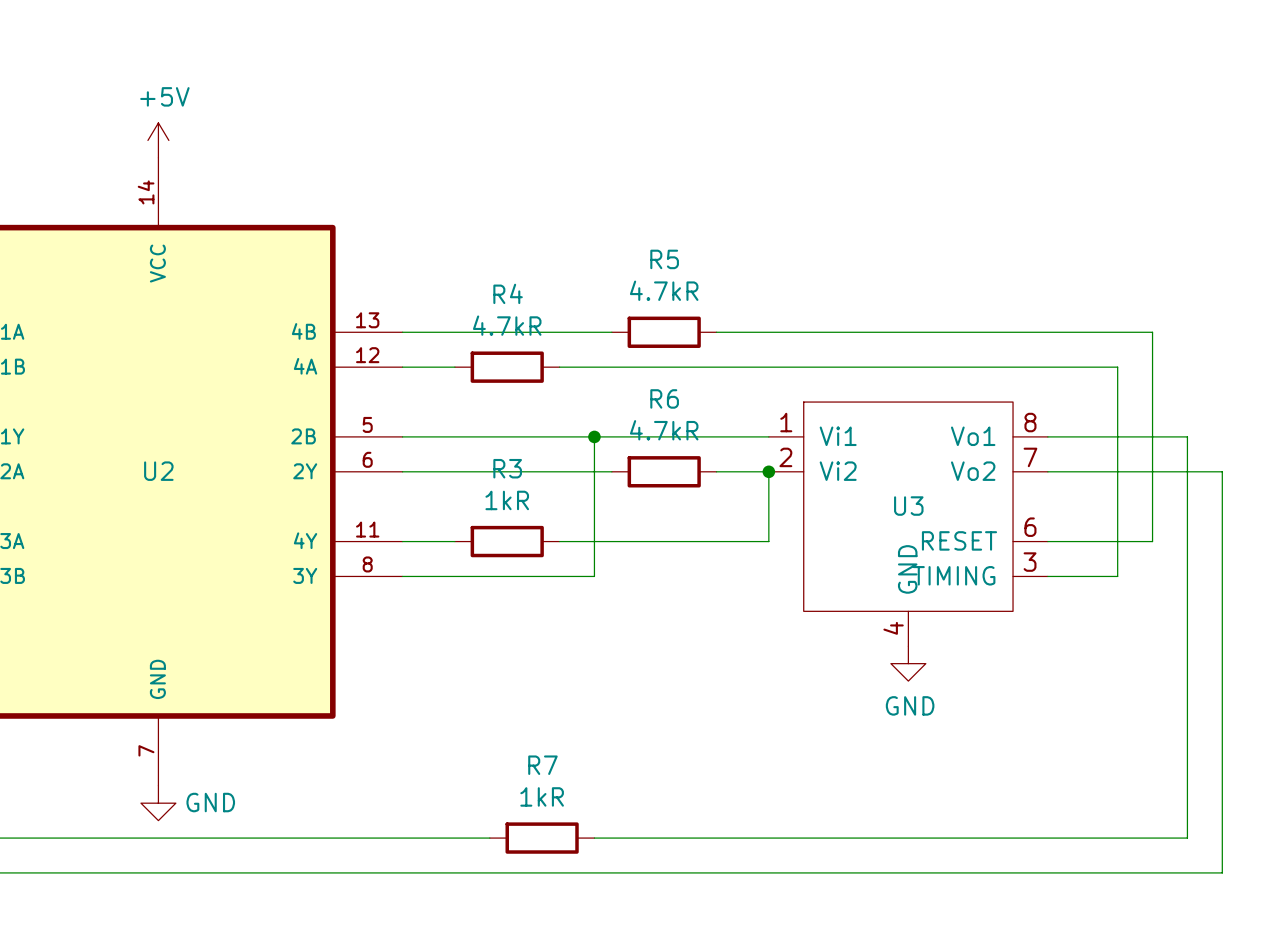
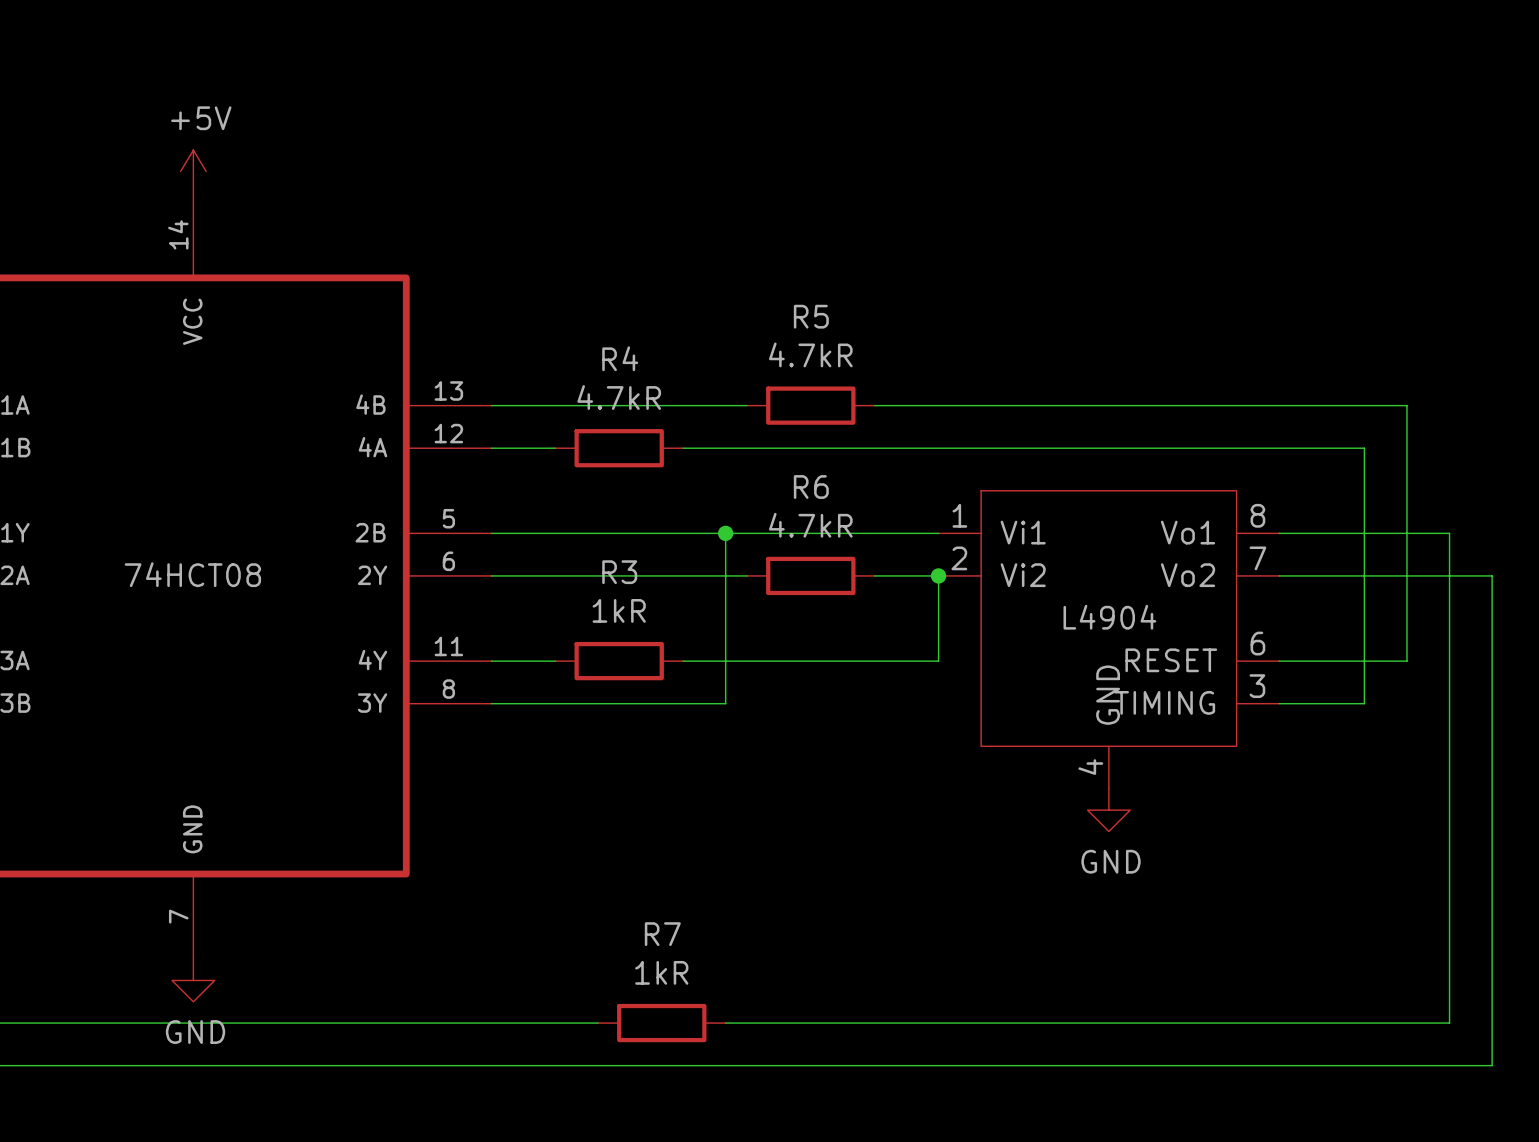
part value: U2 (158, 471) -> 74HCT08 (192, 574)
part value: U3 (908, 506) -> L4904 (1109, 617)
power symbol text position: GND (210, 802) -> GND (195, 1032)

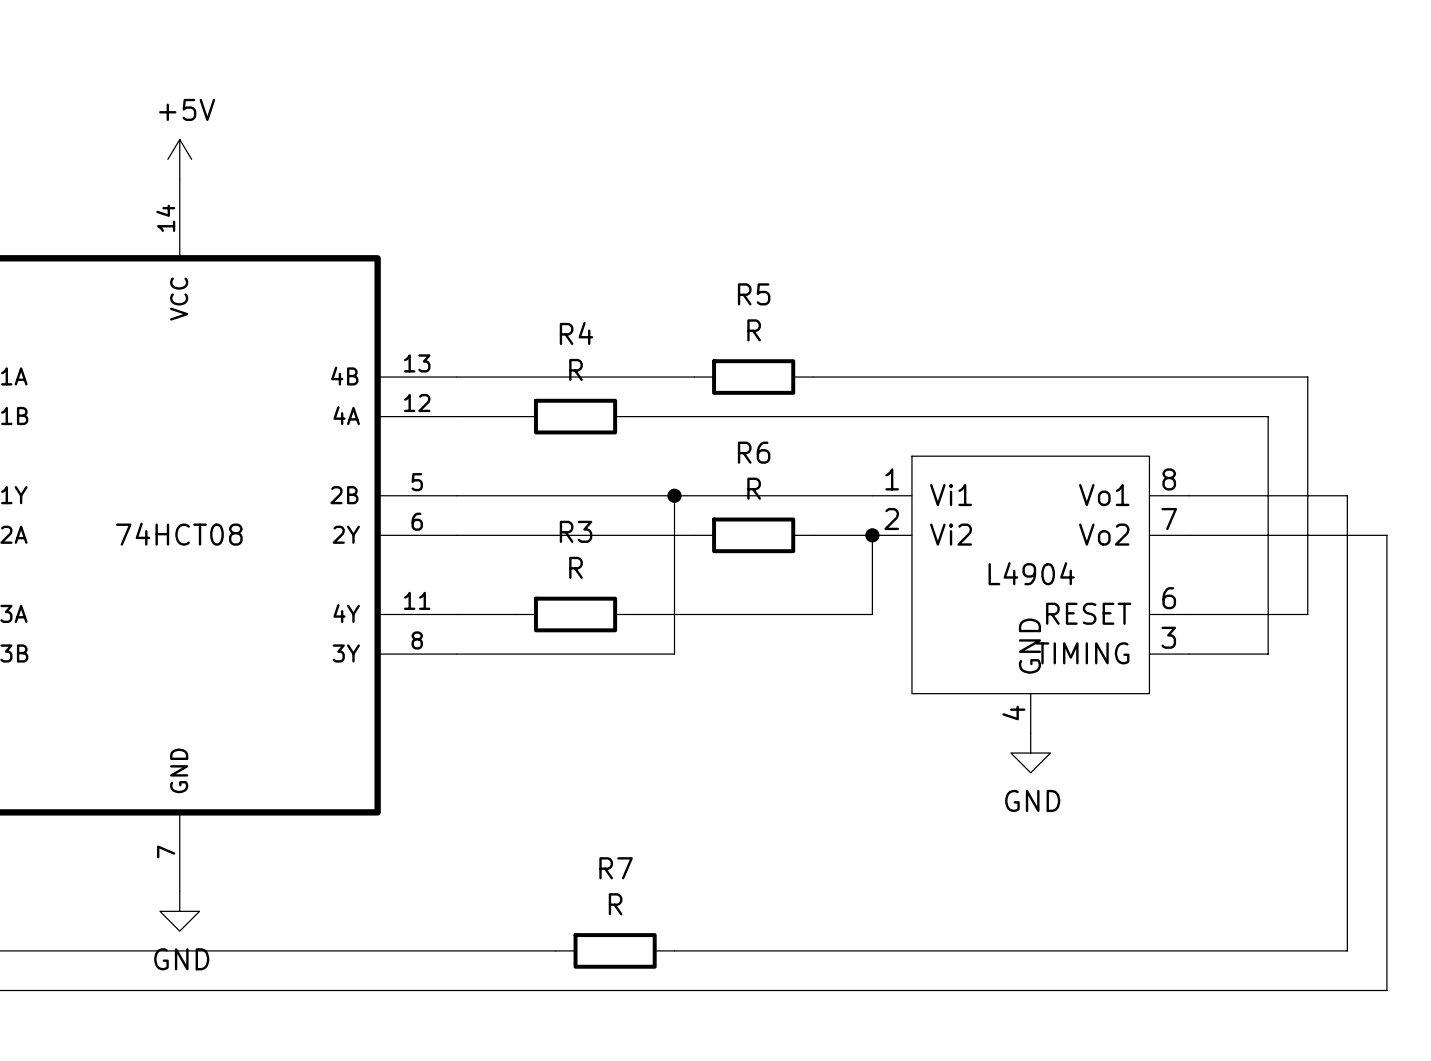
R5 value: 4.7kR (810, 354) -> R (754, 330)
R4 value: 4.7kR (619, 397) -> R (576, 369)
R6 value: 4.7kR (810, 525) -> R (754, 488)
R3 value: 1kR (619, 610) -> R (576, 567)
R7 value: 1kR (661, 972) -> R (615, 904)

